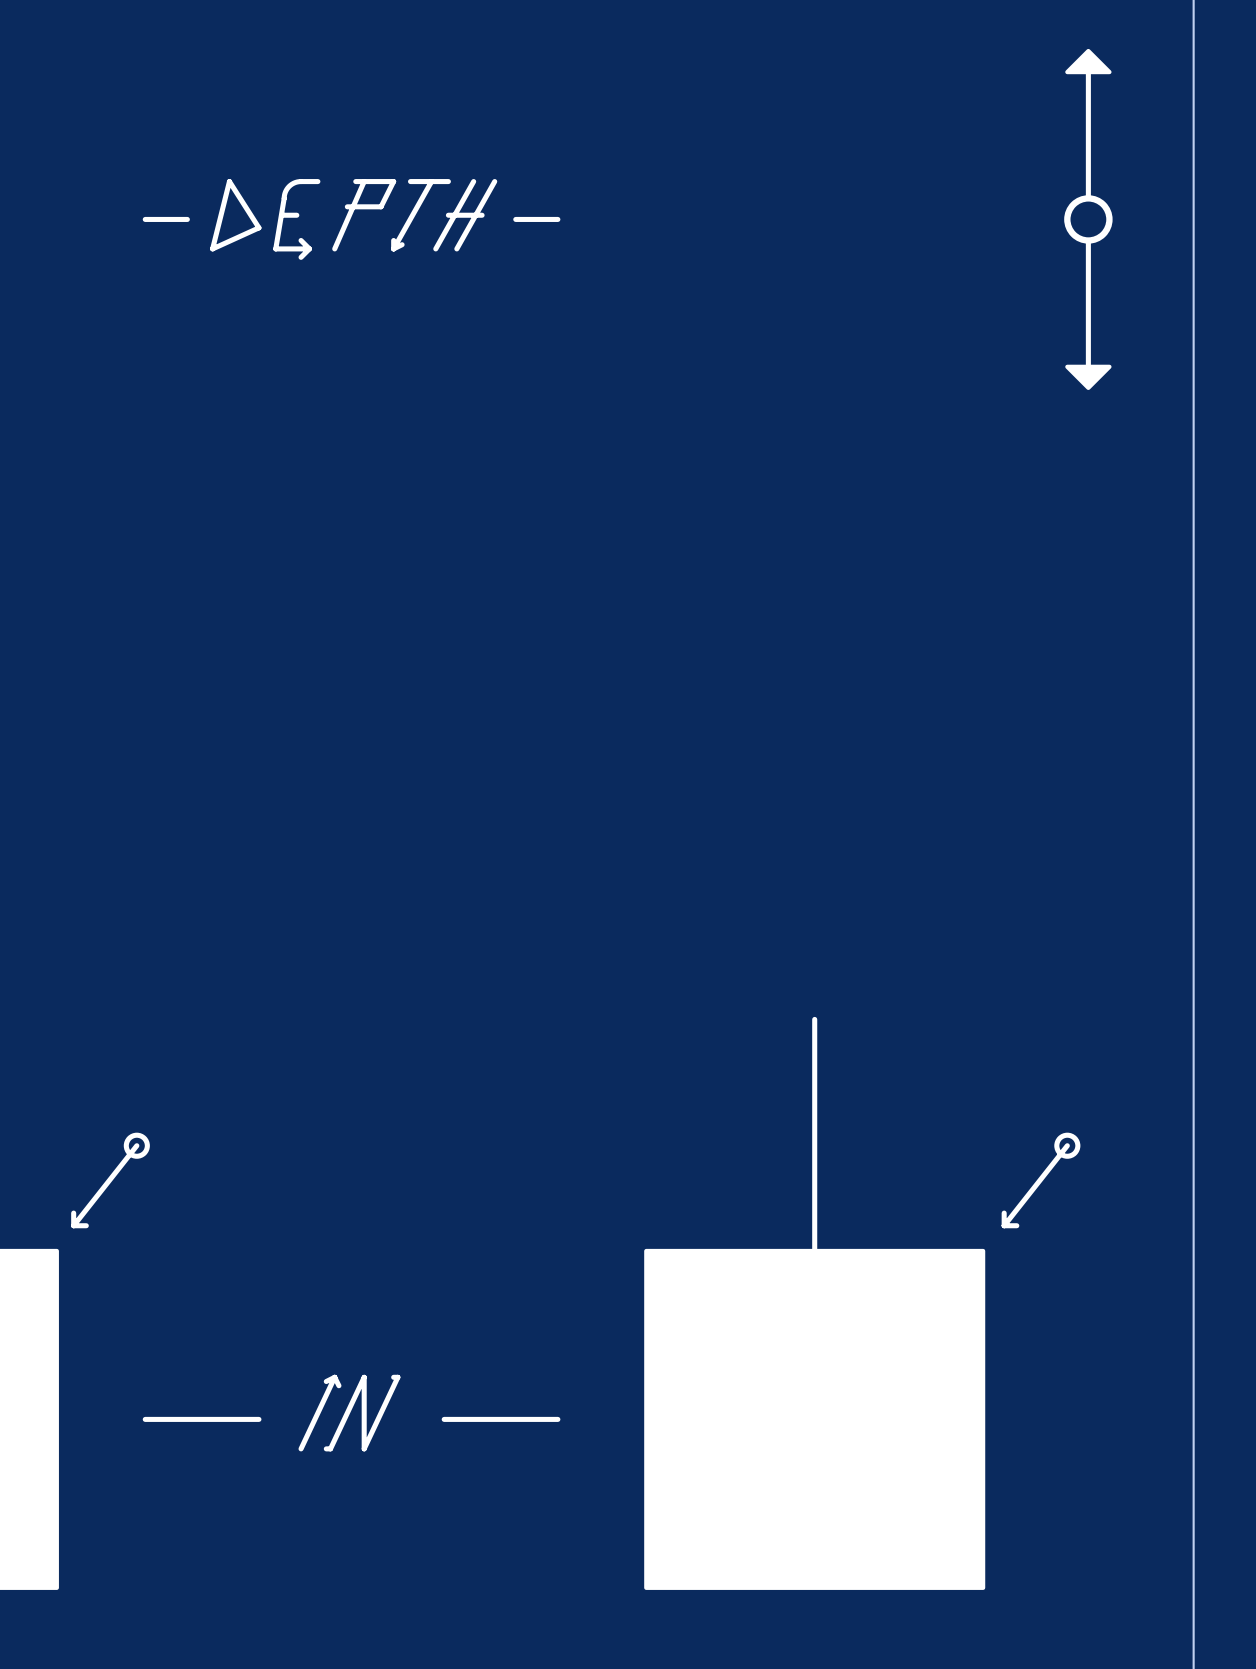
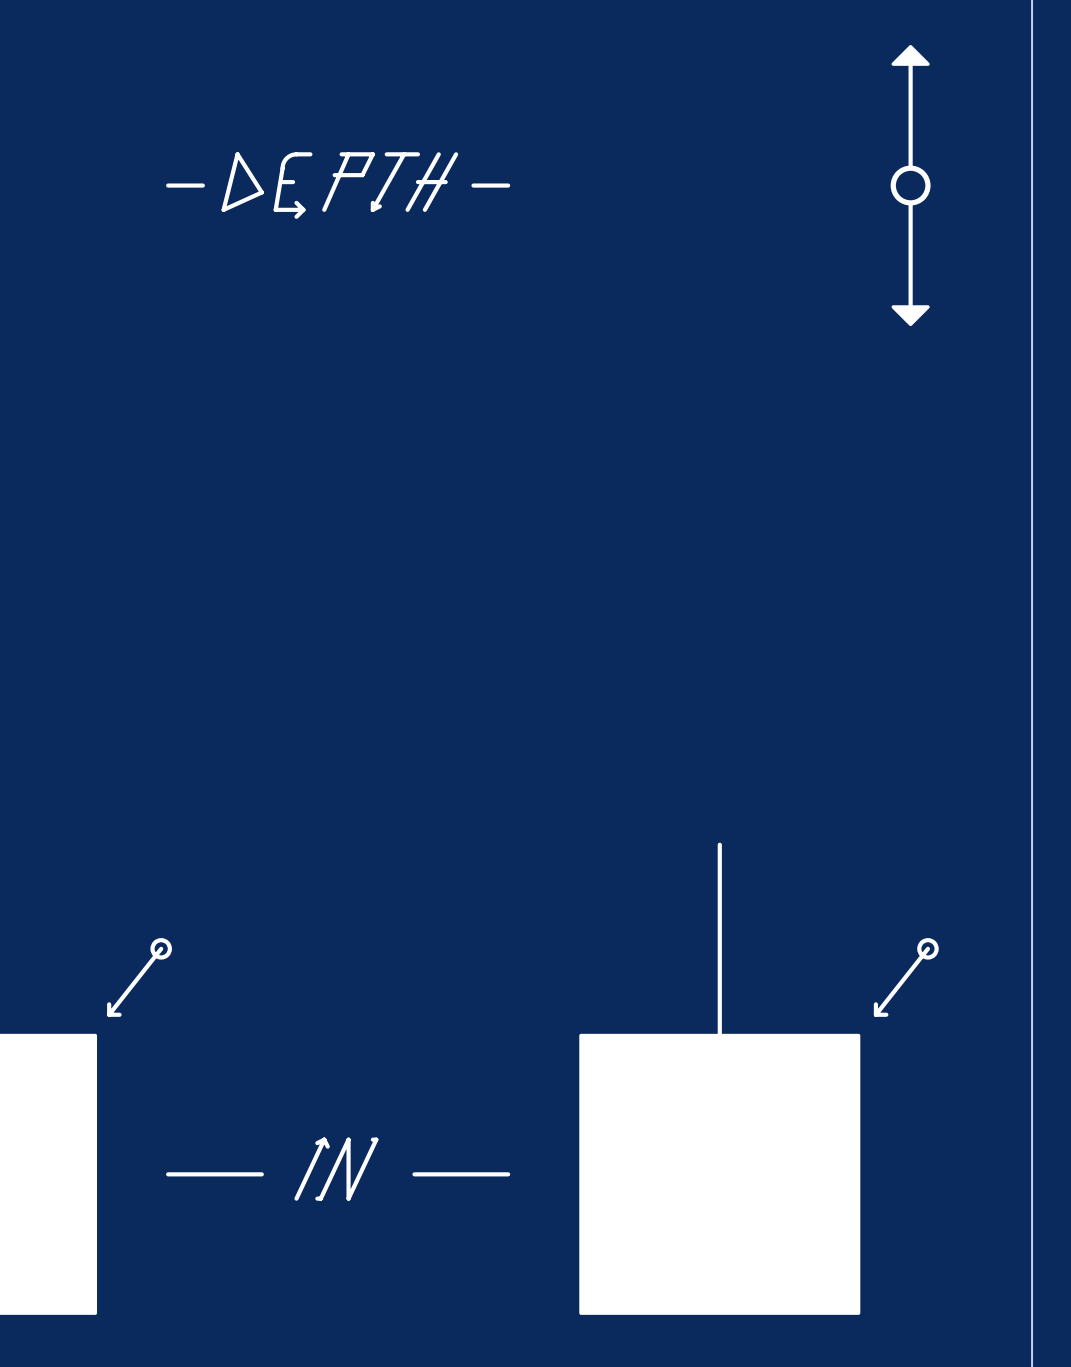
drawing position: (1088, 61) -> (910, 55)
line: (1088, 72) (1088, 198) -> (910, 64) (910, 168)
drawing position: (1088, 219) -> (910, 185)
line: (1088, 240) (1088, 366) -> (910, 202) (910, 306)
drawing position: (1088, 377) -> (910, 315)

